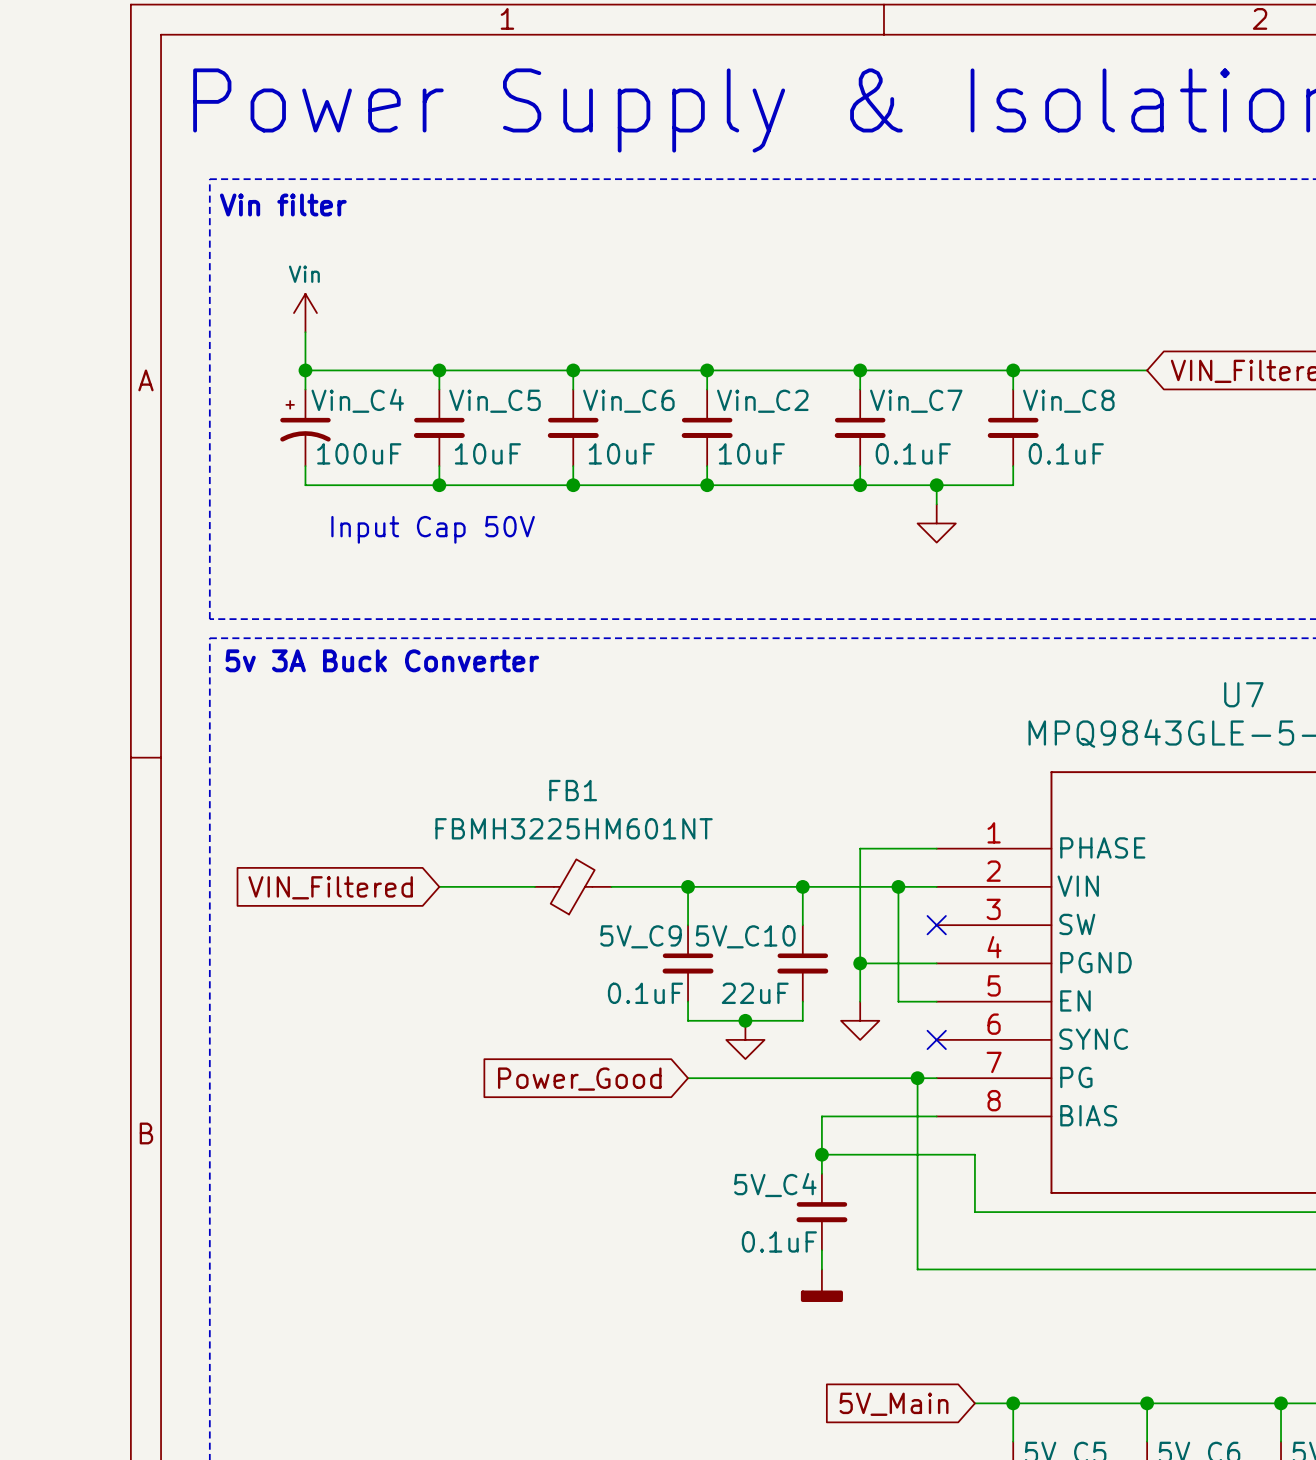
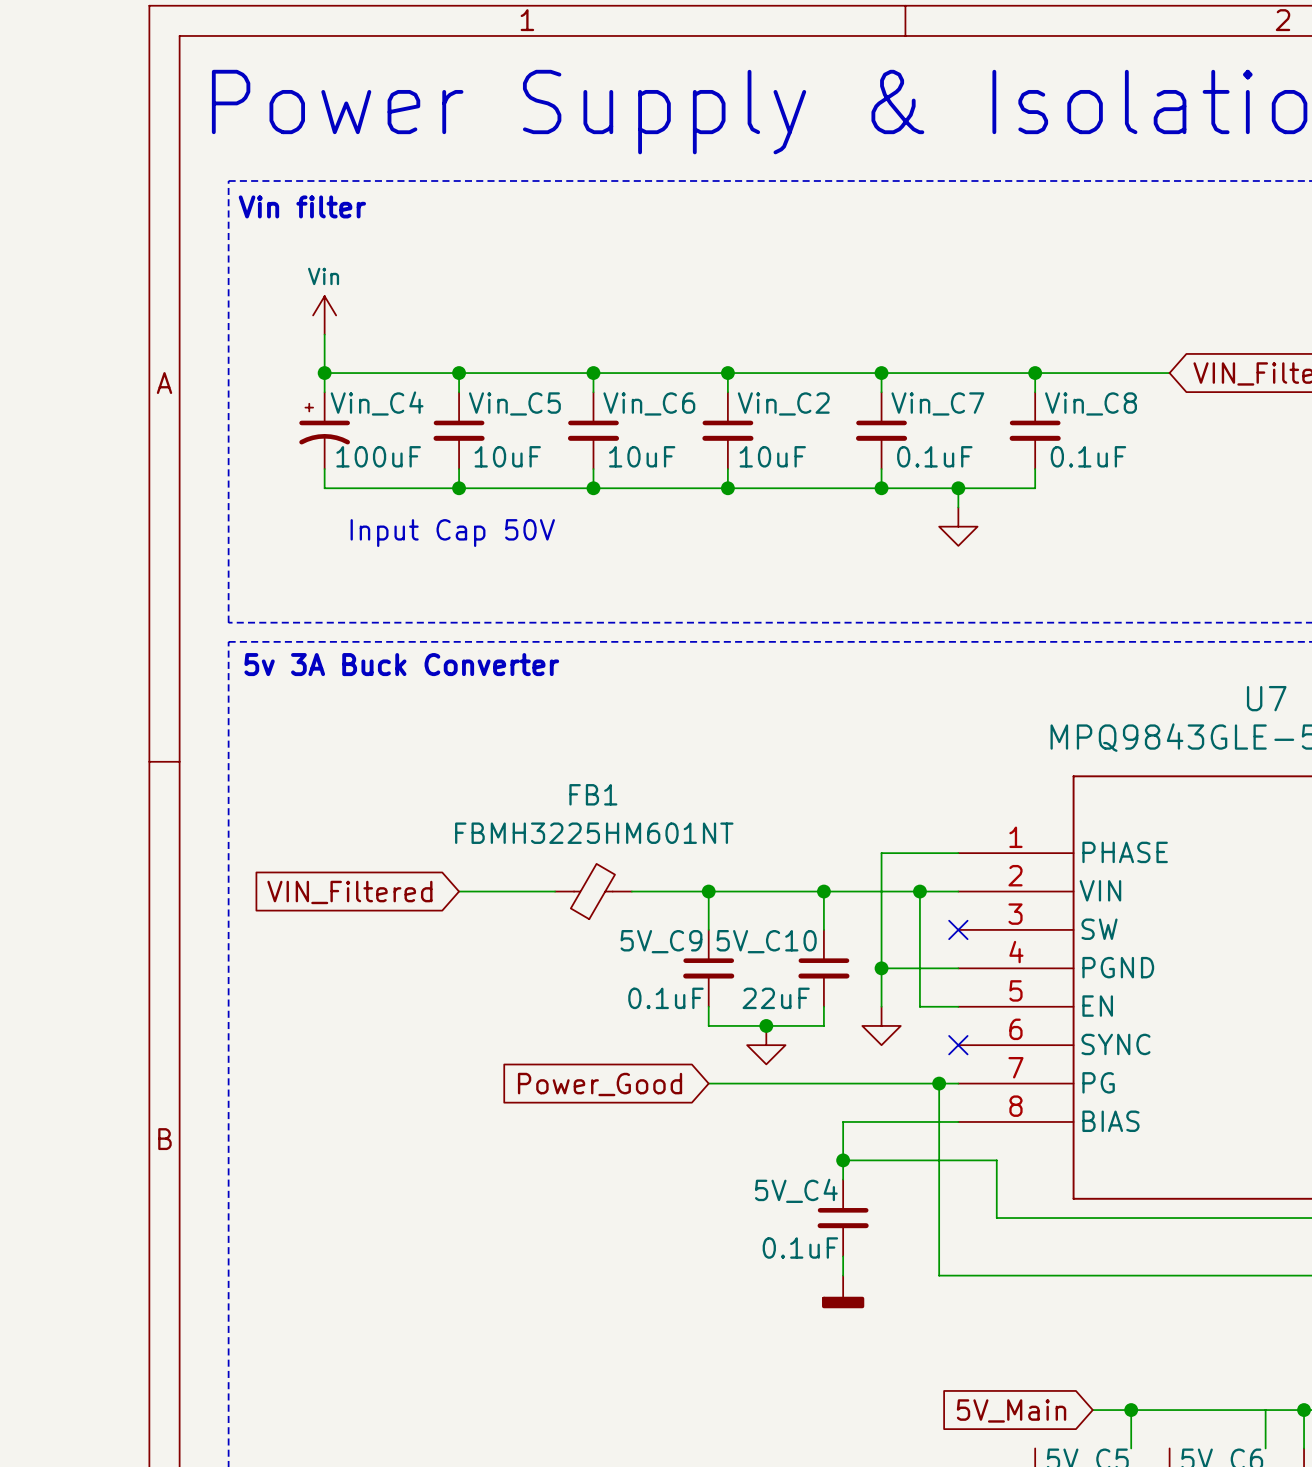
wire: (974, 1403) (1070, 1403) -> none
wire: (1013, 1403) (1013, 1441) -> (1131, 1410) (1131, 1448)
junction: (1013, 1403) -> none
wire: (1147, 1403) (1147, 1441) -> (1265, 1410) (1265, 1448)
junction position: (1147, 1403) -> (1131, 1410)
global label position: 5V_Main (894, 1404) -> 5V_Main (1011, 1410)

